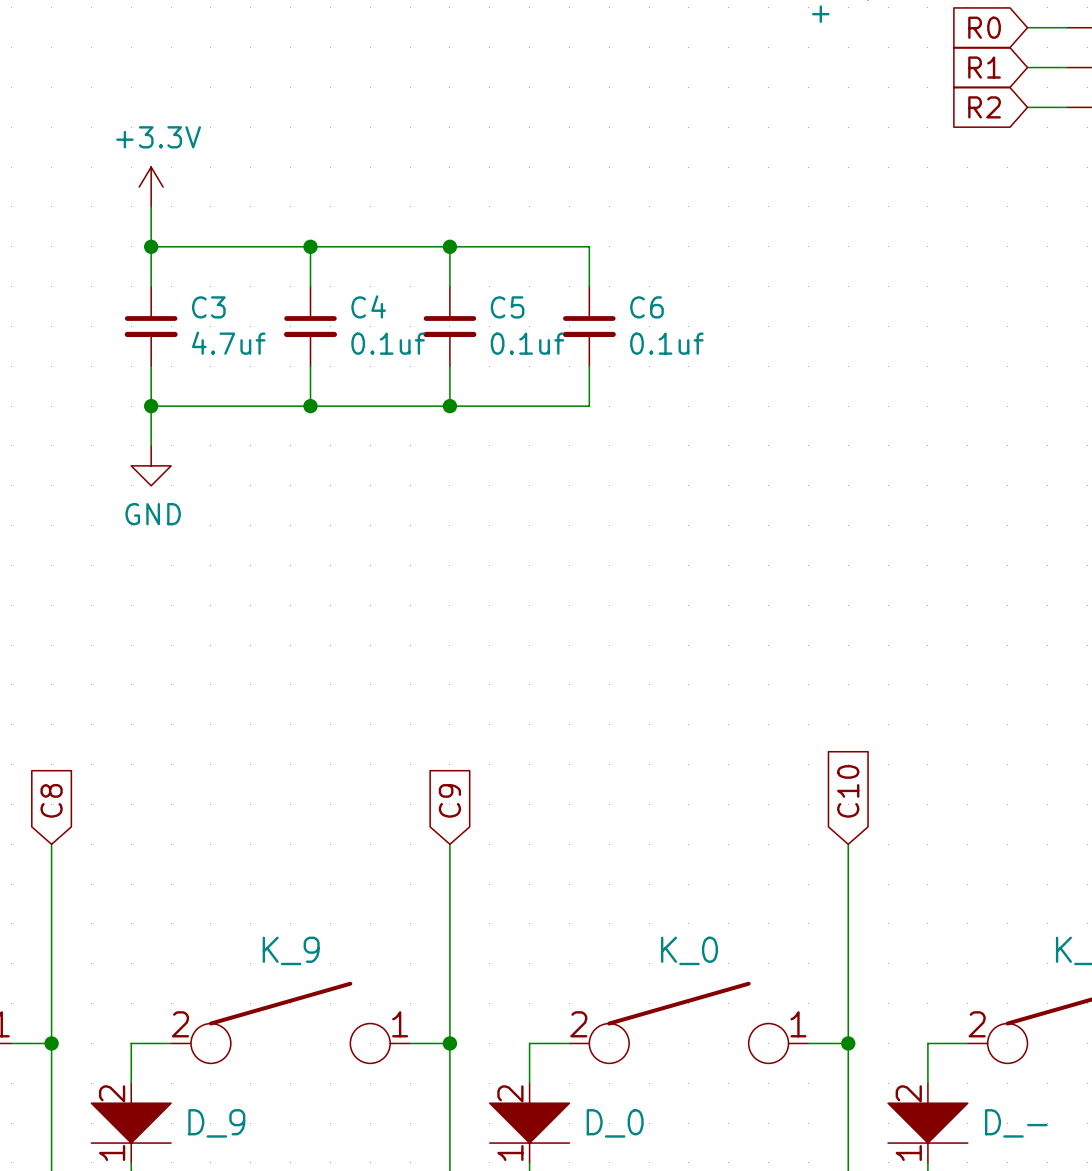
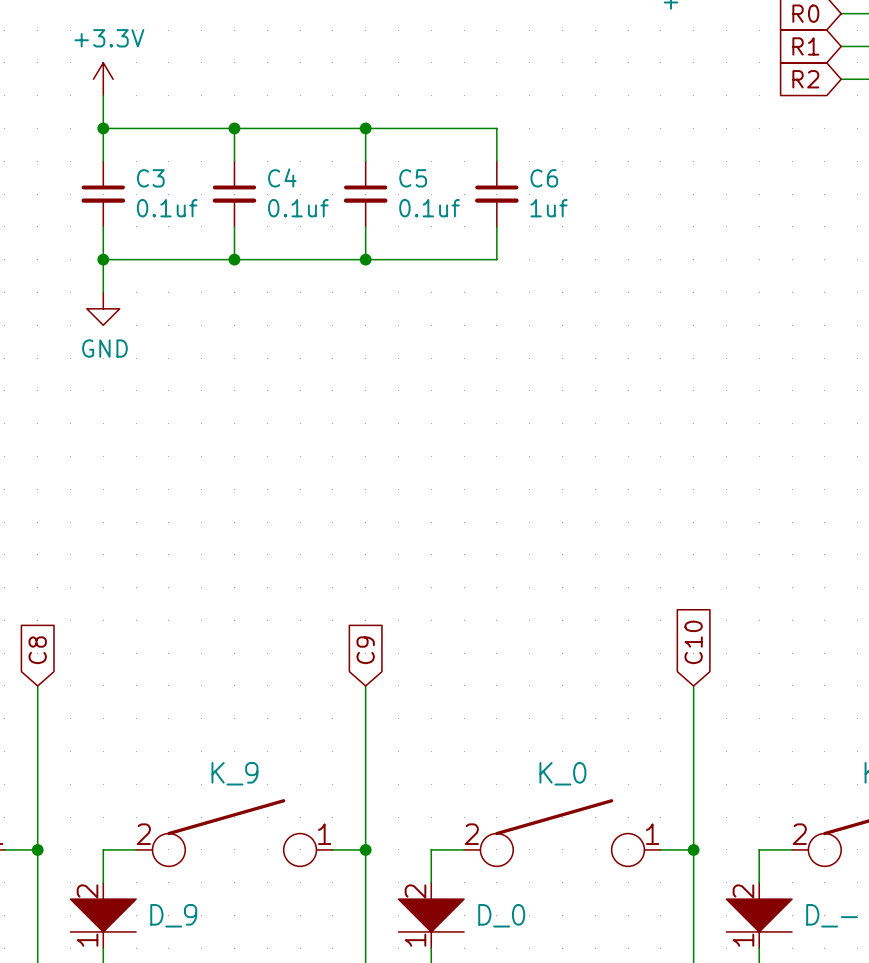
wire: none -> (103, 128) (496, 128) (496, 161)
junction: none -> (103, 128)
junction: none -> (234, 128)
junction: none -> (365, 128)
power symbol position: +3.3V (151, 187) -> +3.3V (103, 79)
wire: (151, 206) (151, 286) -> (103, 95) (103, 161)
wire: (151, 246) (589, 246) (589, 286) -> none
junction: (151, 246) -> none
wire: (310, 246) (310, 286) -> (234, 128) (234, 161)
junction: (310, 246) -> none
junction: (449, 246) -> none
wire: none -> (496, 226) (496, 259) (103, 259)
junction: none -> (103, 259)
C3 position: (151, 326) -> (103, 194)
junction: none -> (234, 259)
C4 position: (310, 326) -> (234, 194)
C5 position: (449, 326) -> (365, 194)
junction: none -> (365, 259)
C6 position: (589, 326) -> (496, 194)
C3 value: 4.7uf (228, 343) -> 0.1uf (167, 208)
C6 value: 0.1uf (666, 343) -> 1uf (549, 208)
wire: (151, 366) (151, 445) -> (103, 226) (103, 292)
wire: (310, 366) (310, 406) -> (234, 226) (234, 259)
wire: (449, 366) (449, 406) -> (365, 128) (365, 161)
wire: (589, 366) (589, 406) (151, 406) -> none
junction: (151, 406) -> none
junction: (310, 406) -> none
junction: (449, 406) -> none
power symbol position: GND (151, 465) -> GND (103, 308)

